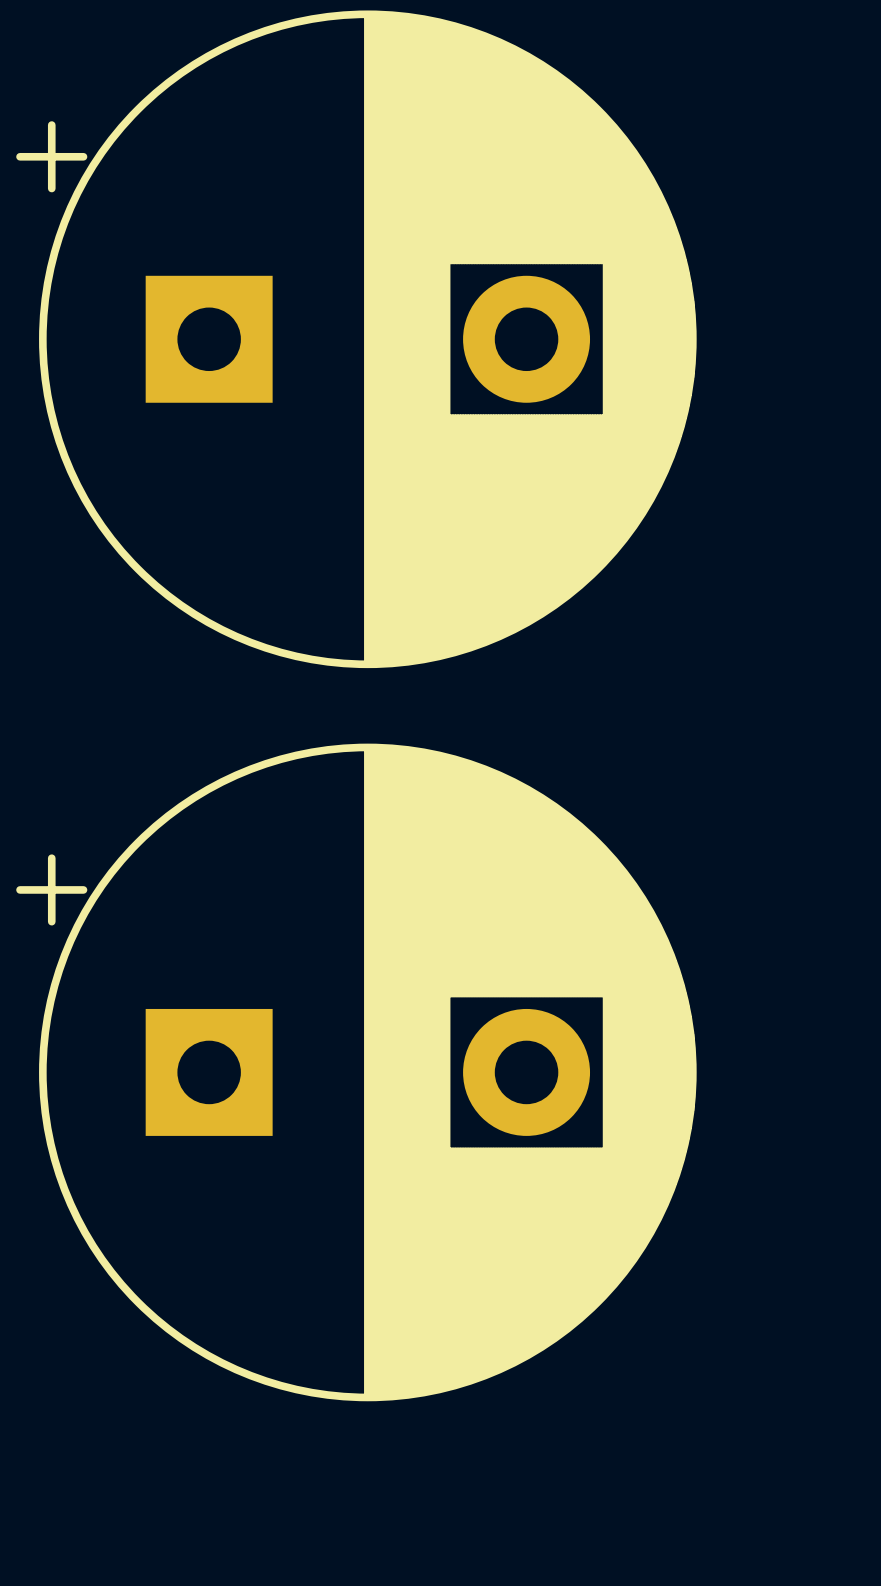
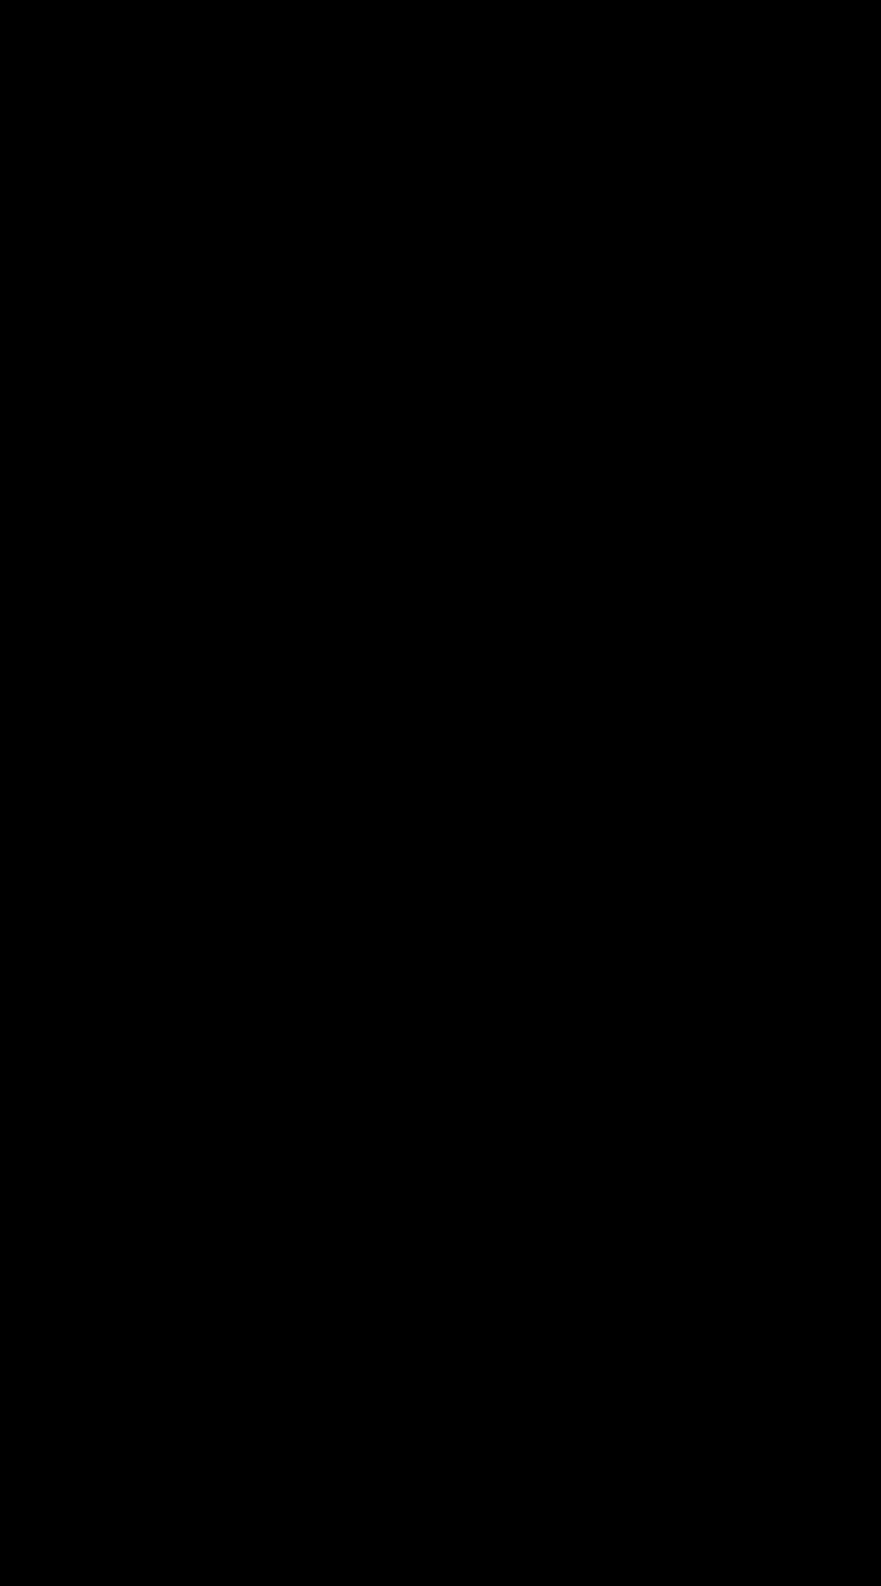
part: (356, 339) -> none
part: (356, 1072) -> none

